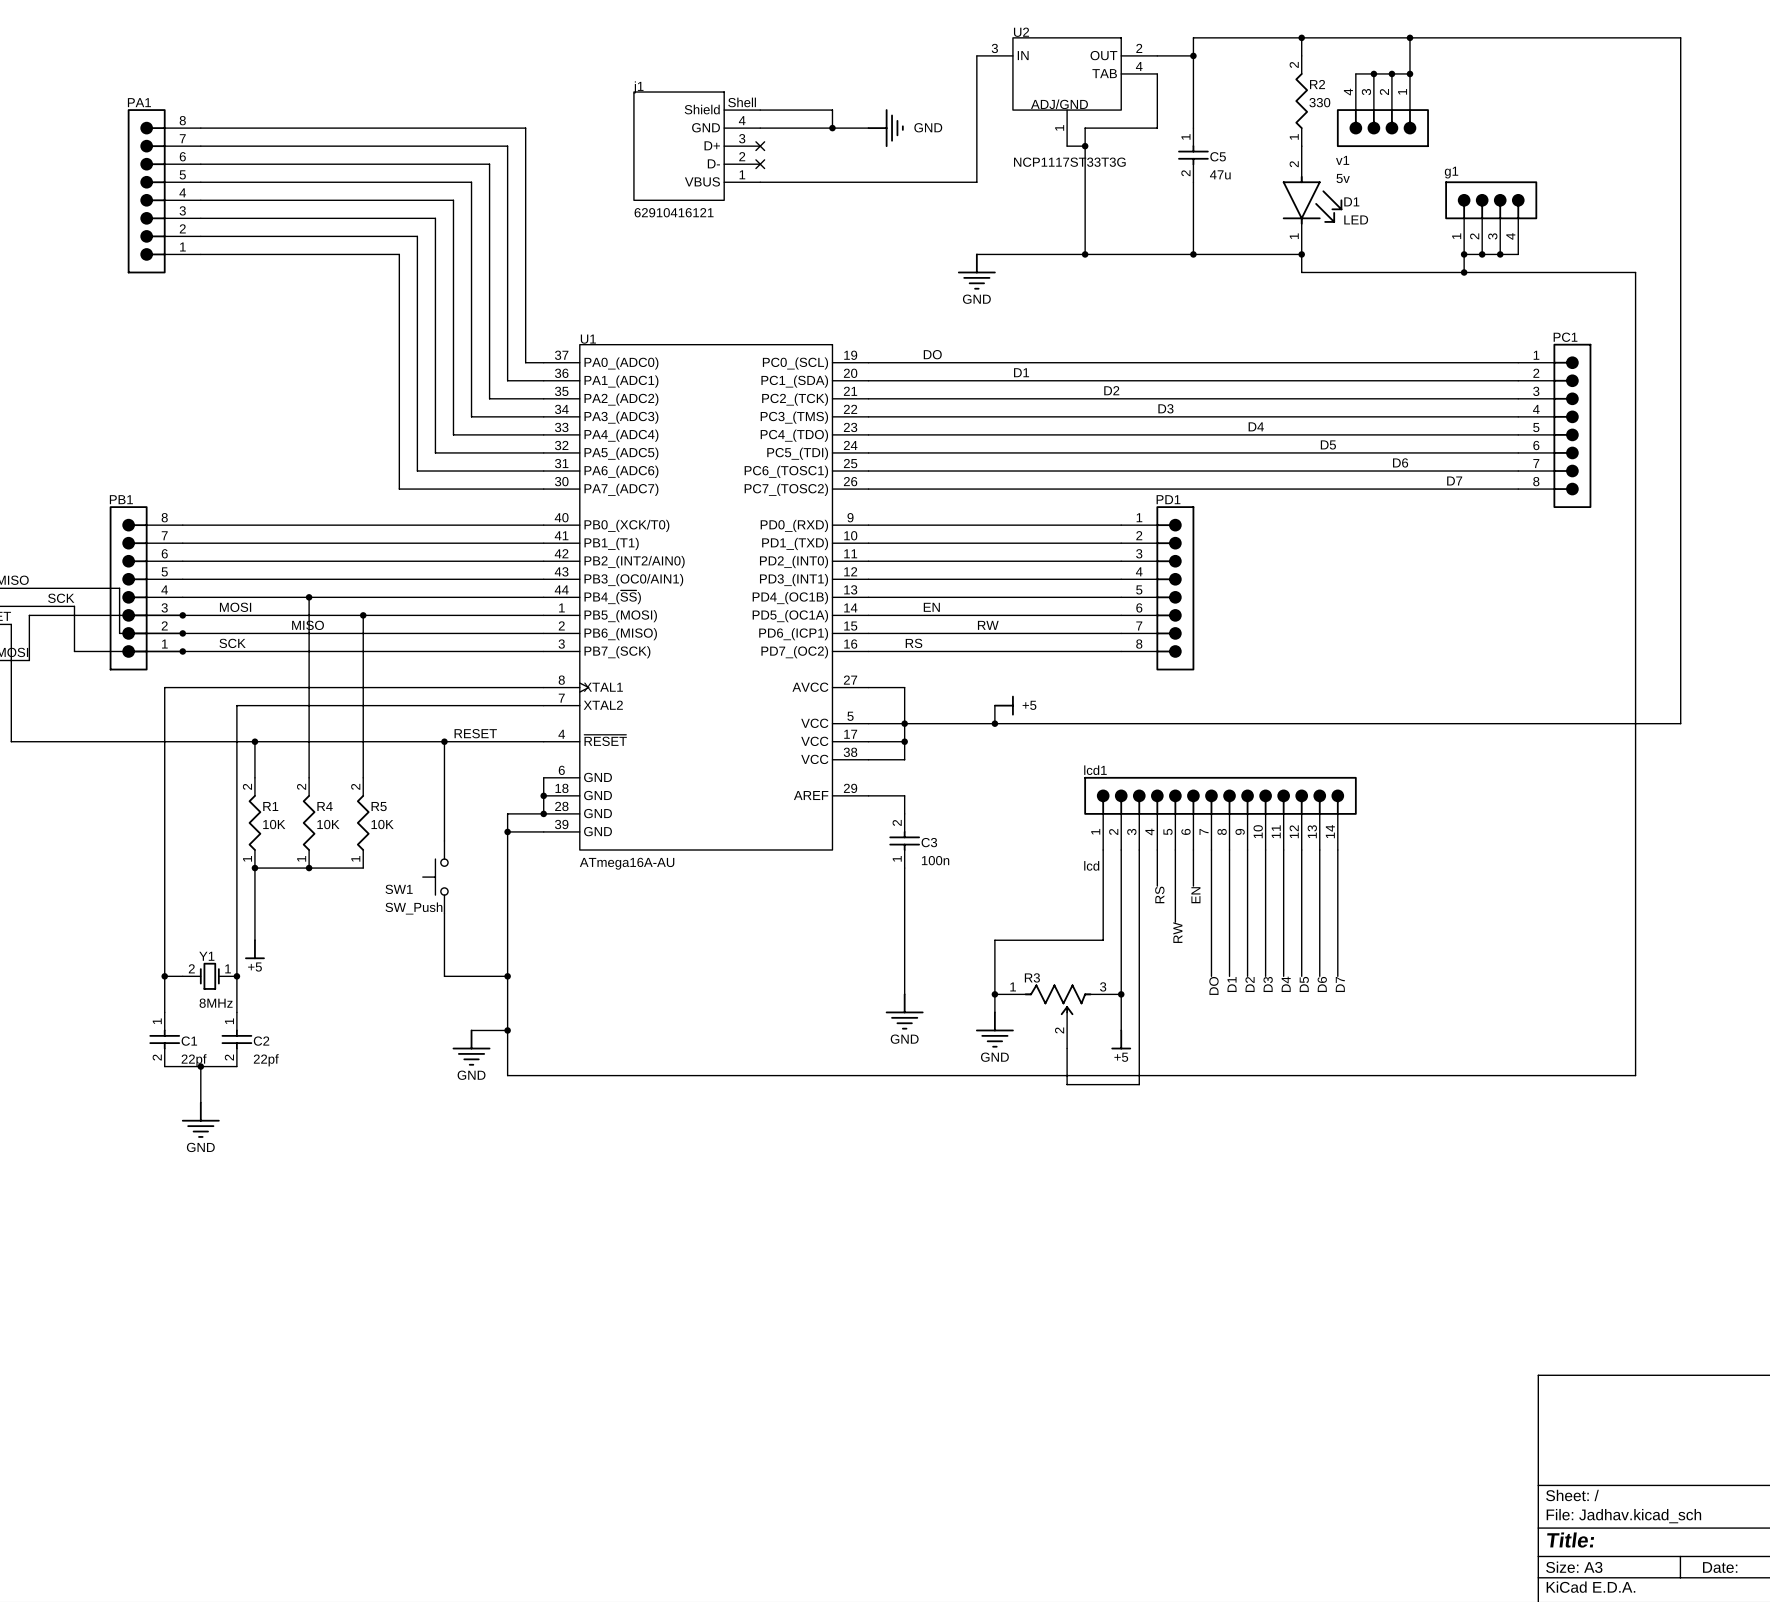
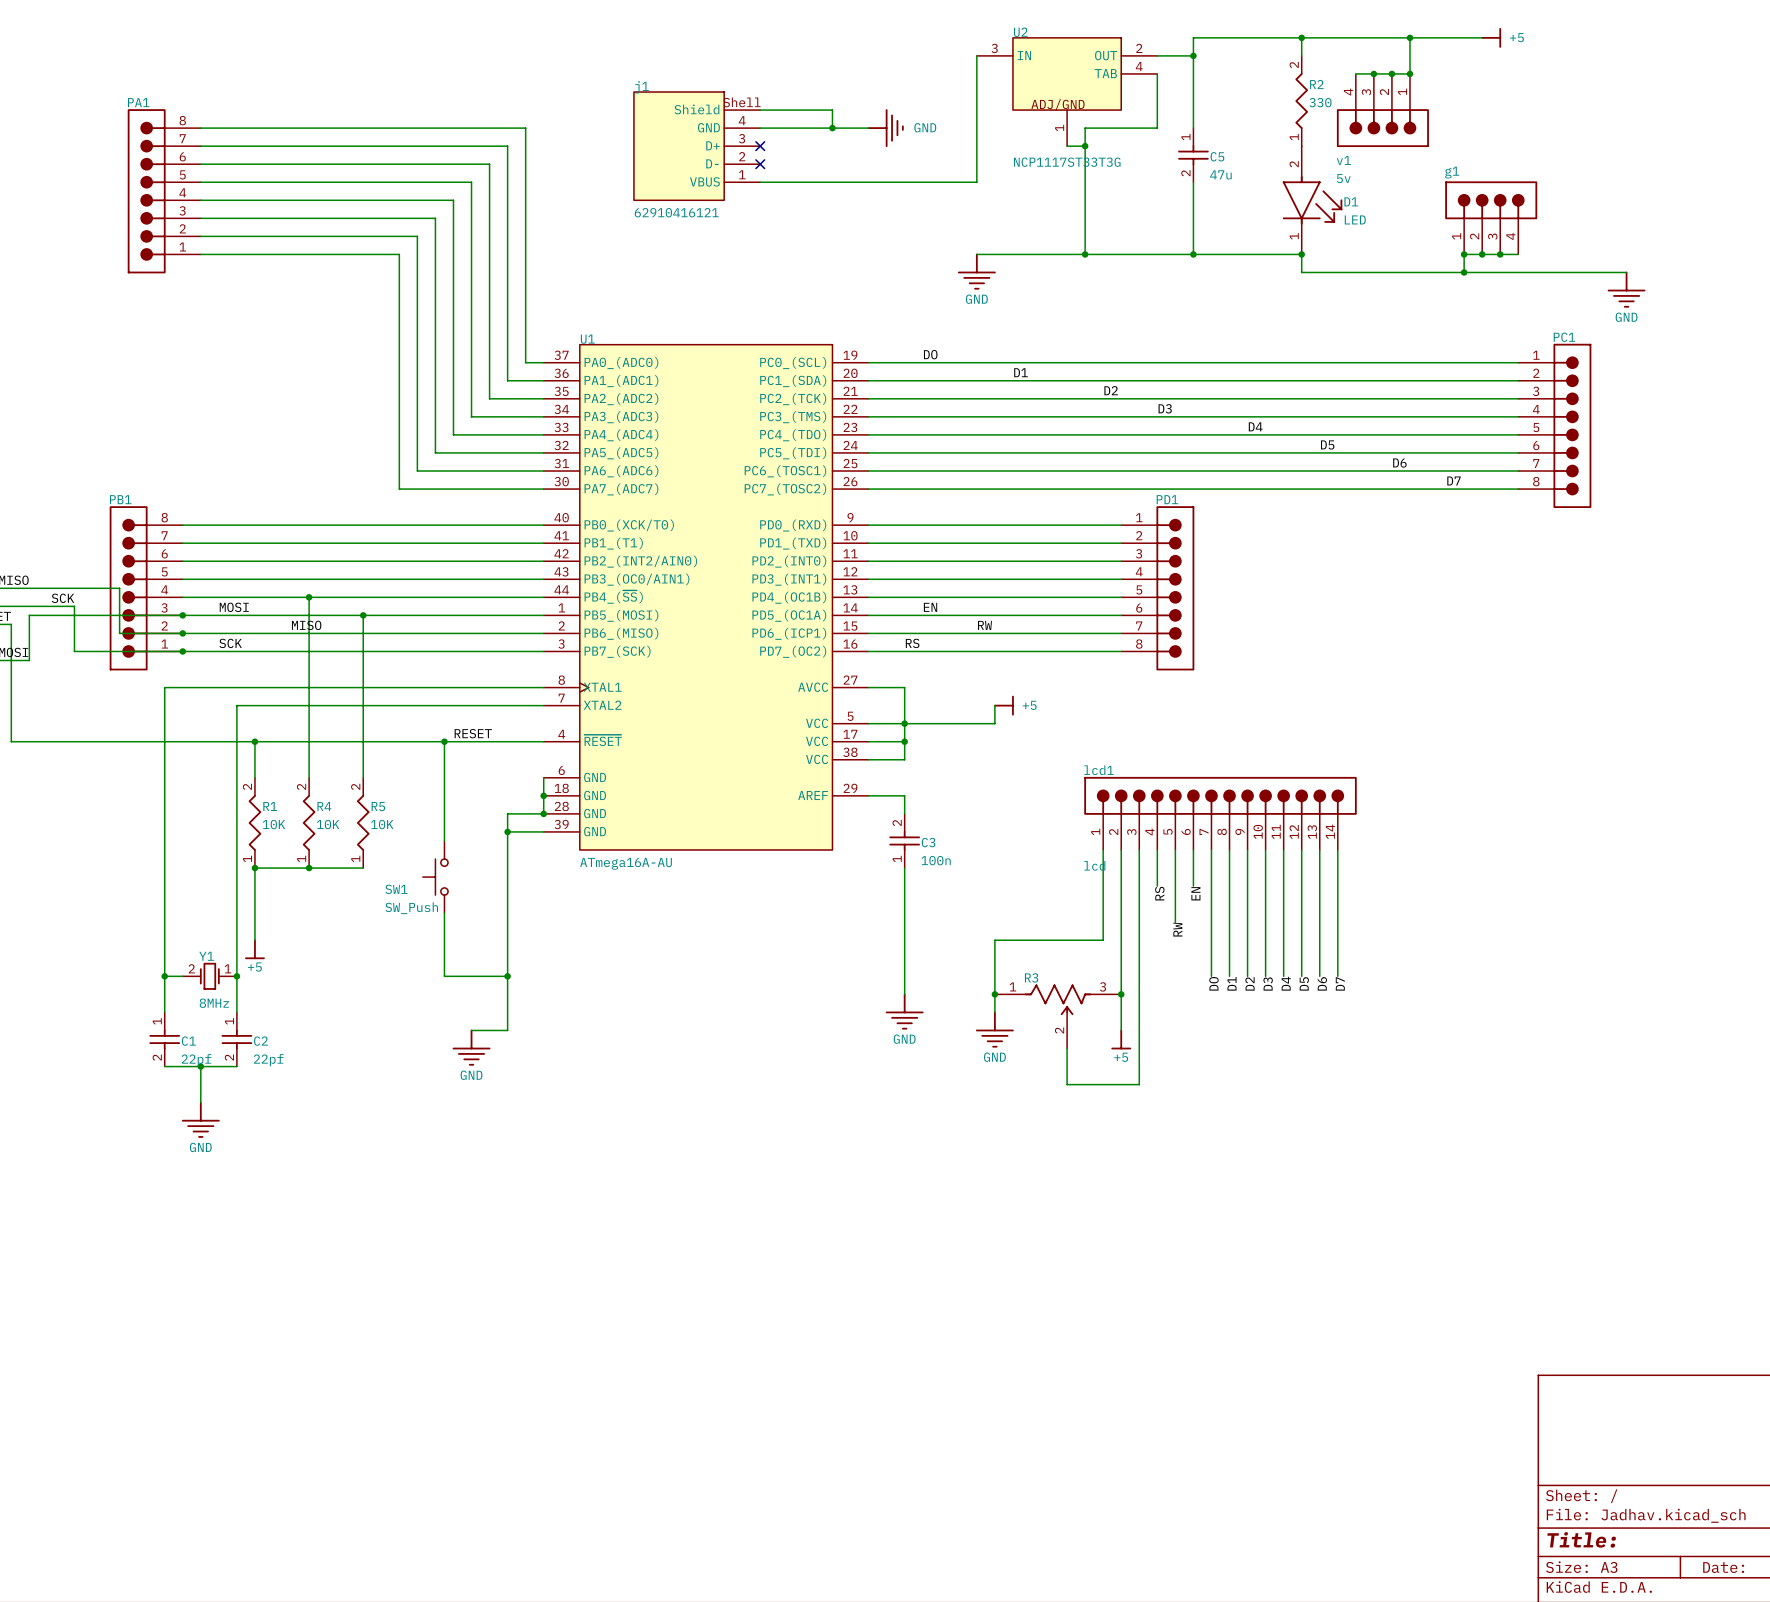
wire: (1482, 37) (1680, 37) (1680, 723) (994, 723) -> none
power symbol: none -> +5 (1491, 37)
wire: (1626, 272) (1635, 272) (1635, 1075) (507, 1075) (507, 1030) -> none
power symbol: none -> GND (1626, 289)
junction: (994, 723) -> none
junction: (507, 1030) -> none

